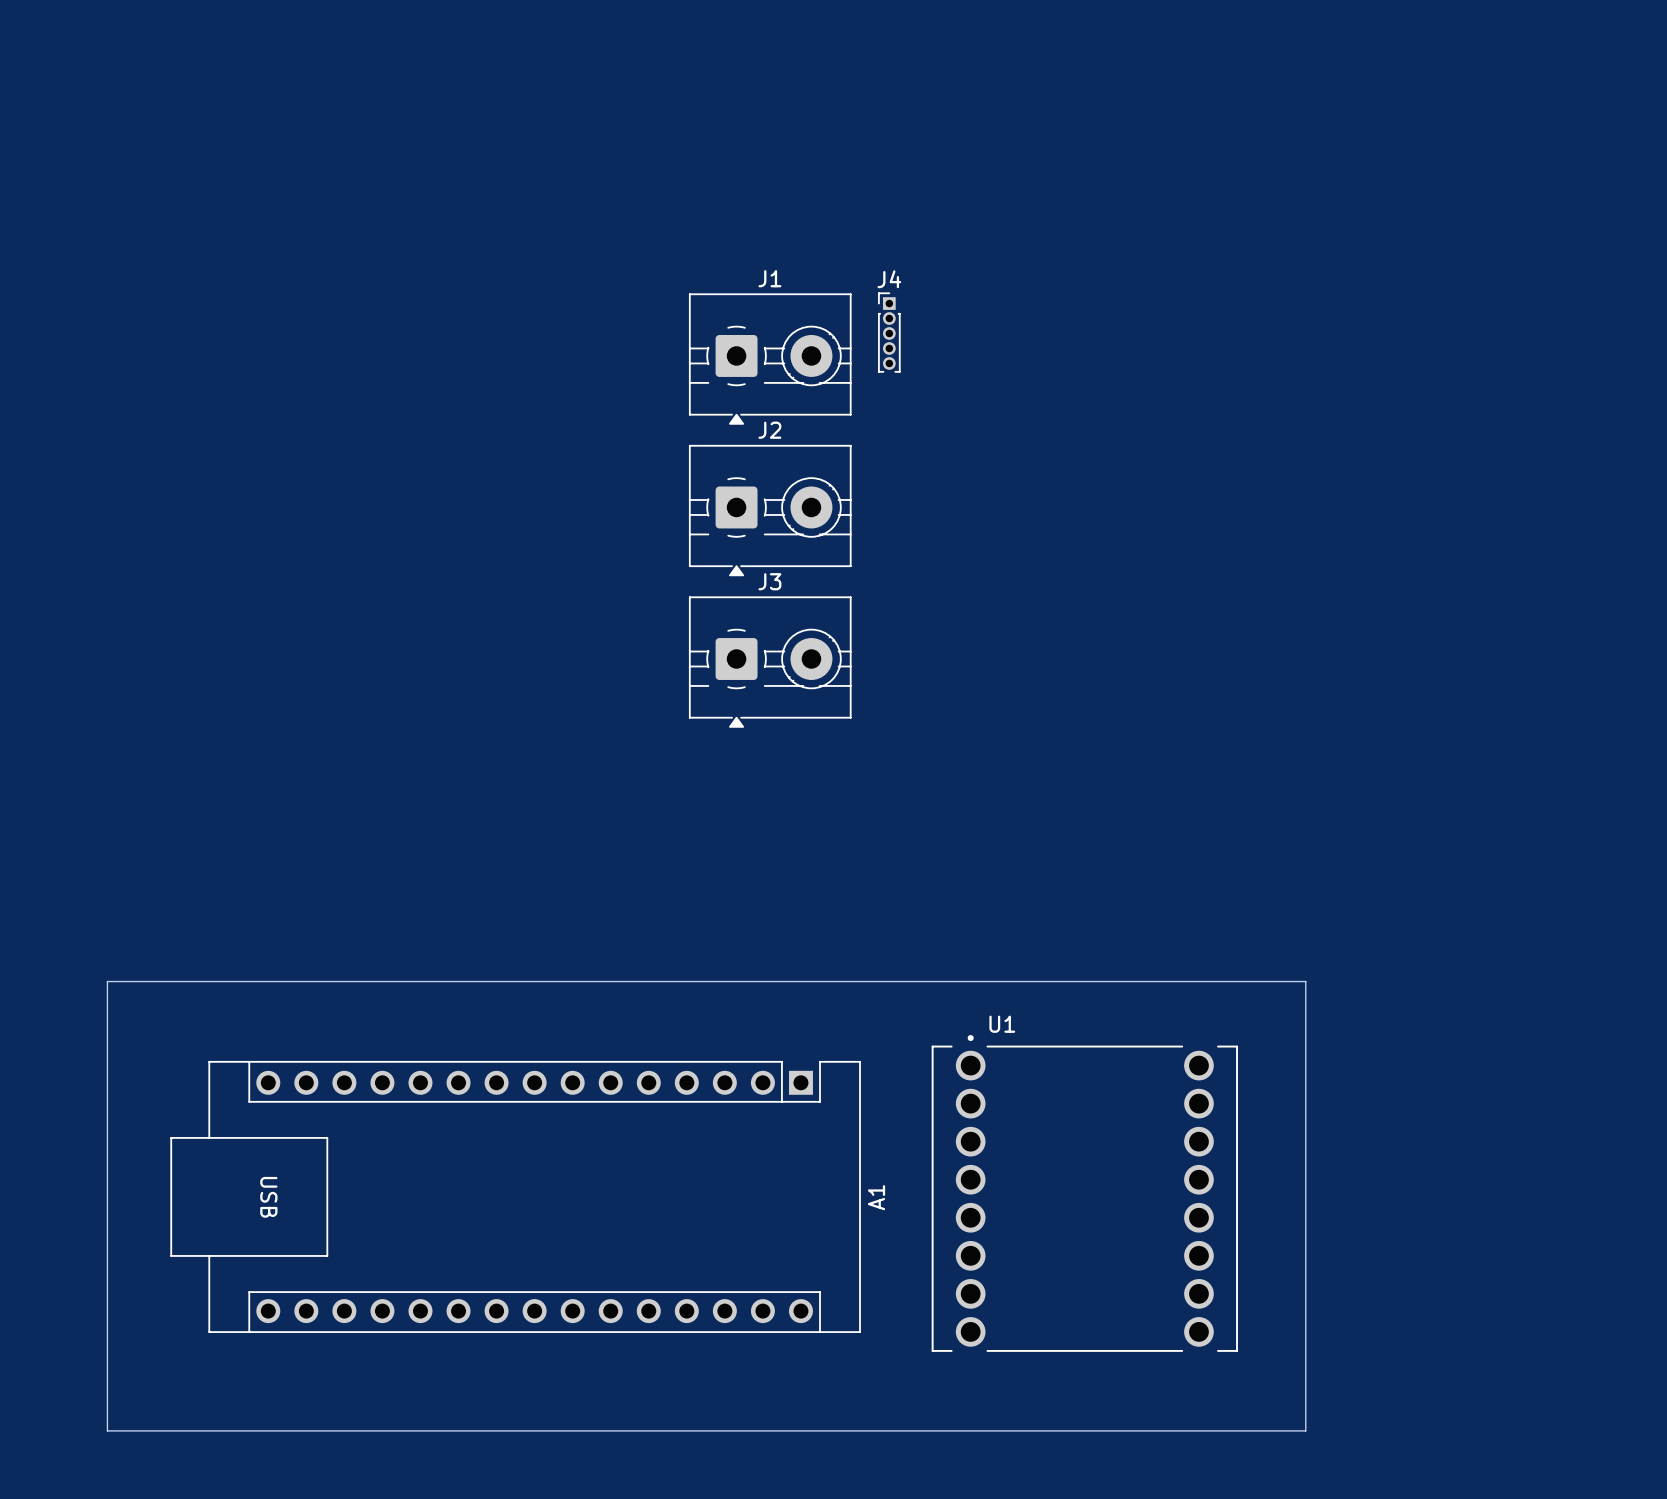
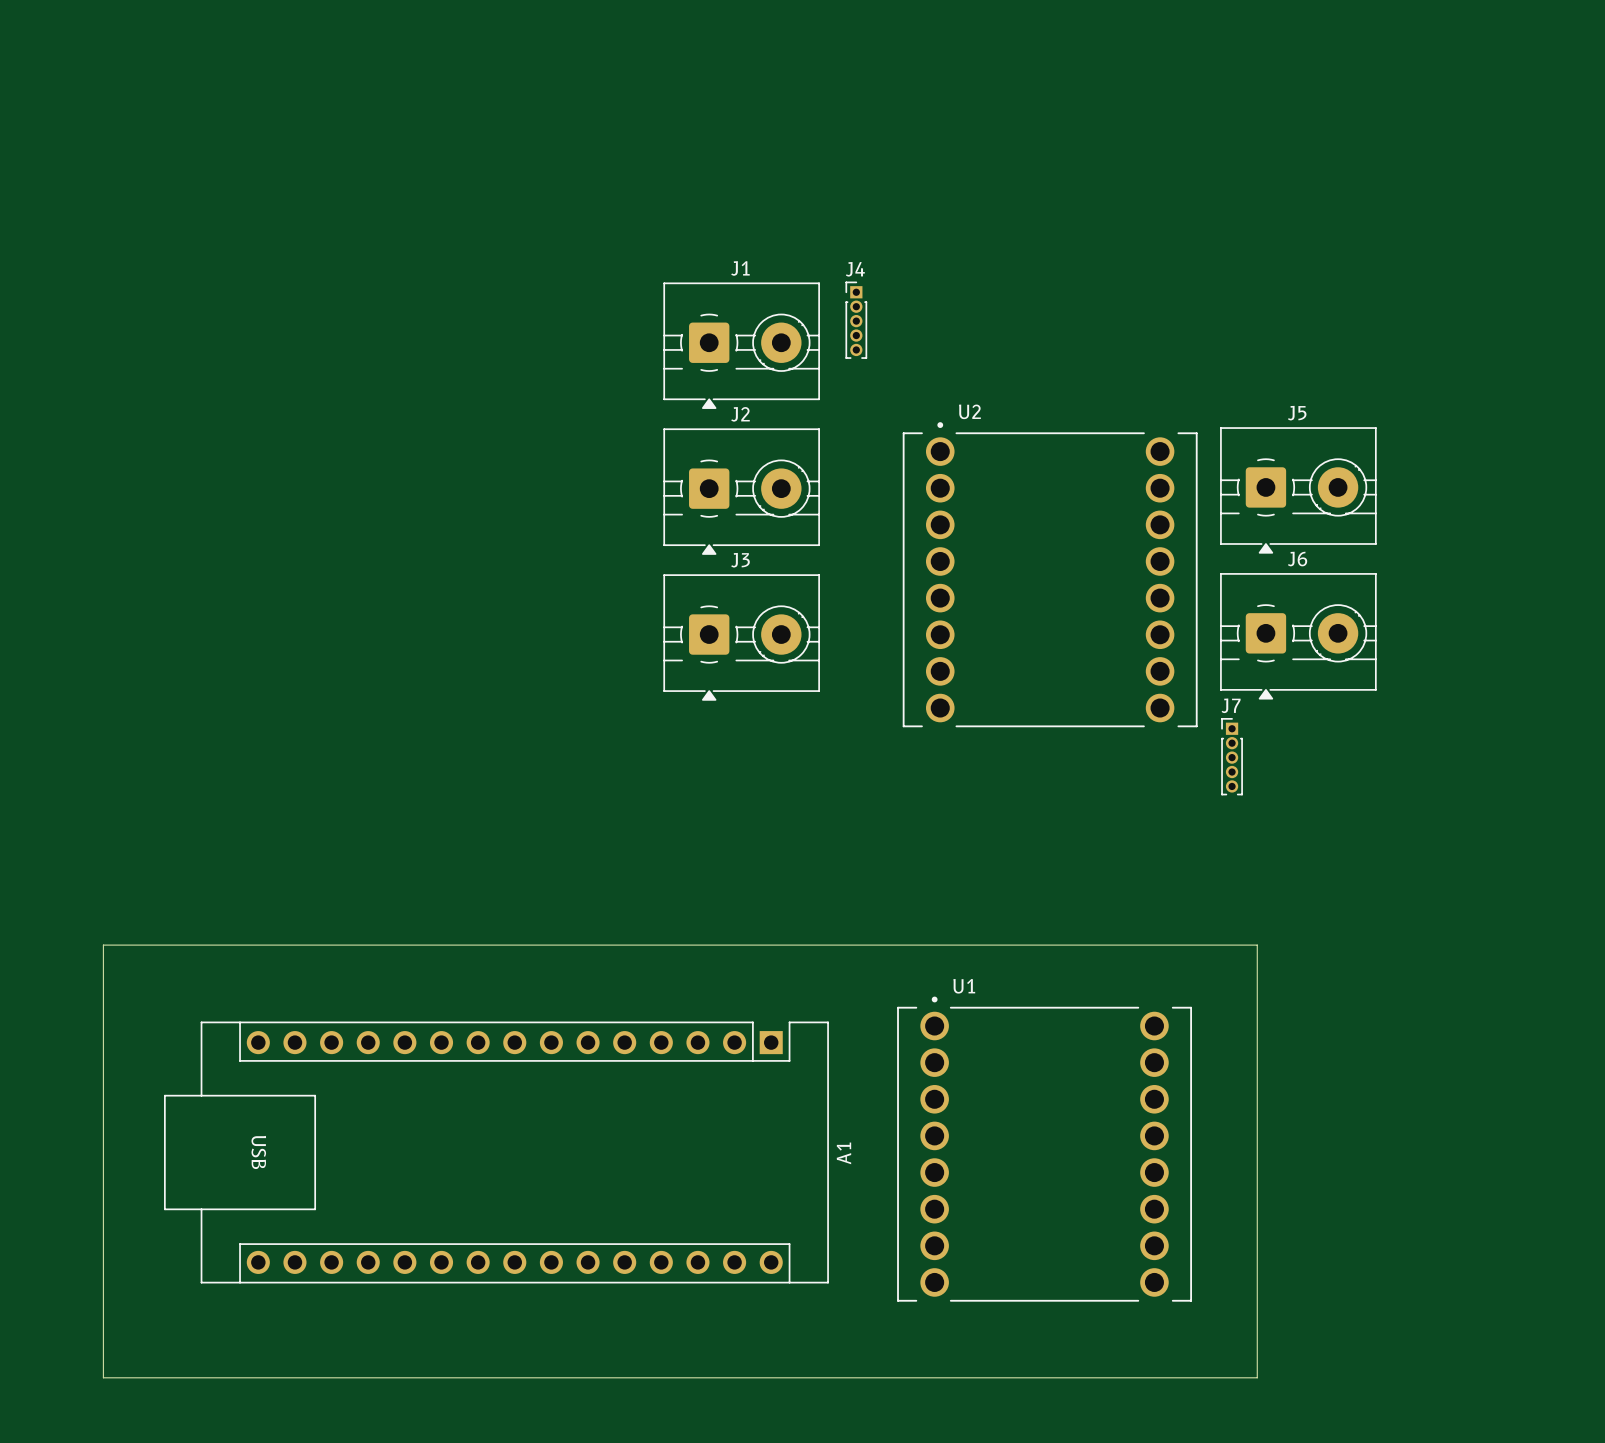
J5: none -> (1298, 490)
U2: none -> (1050, 574)
J6: none -> (1298, 636)
J7: none -> (1232, 756)

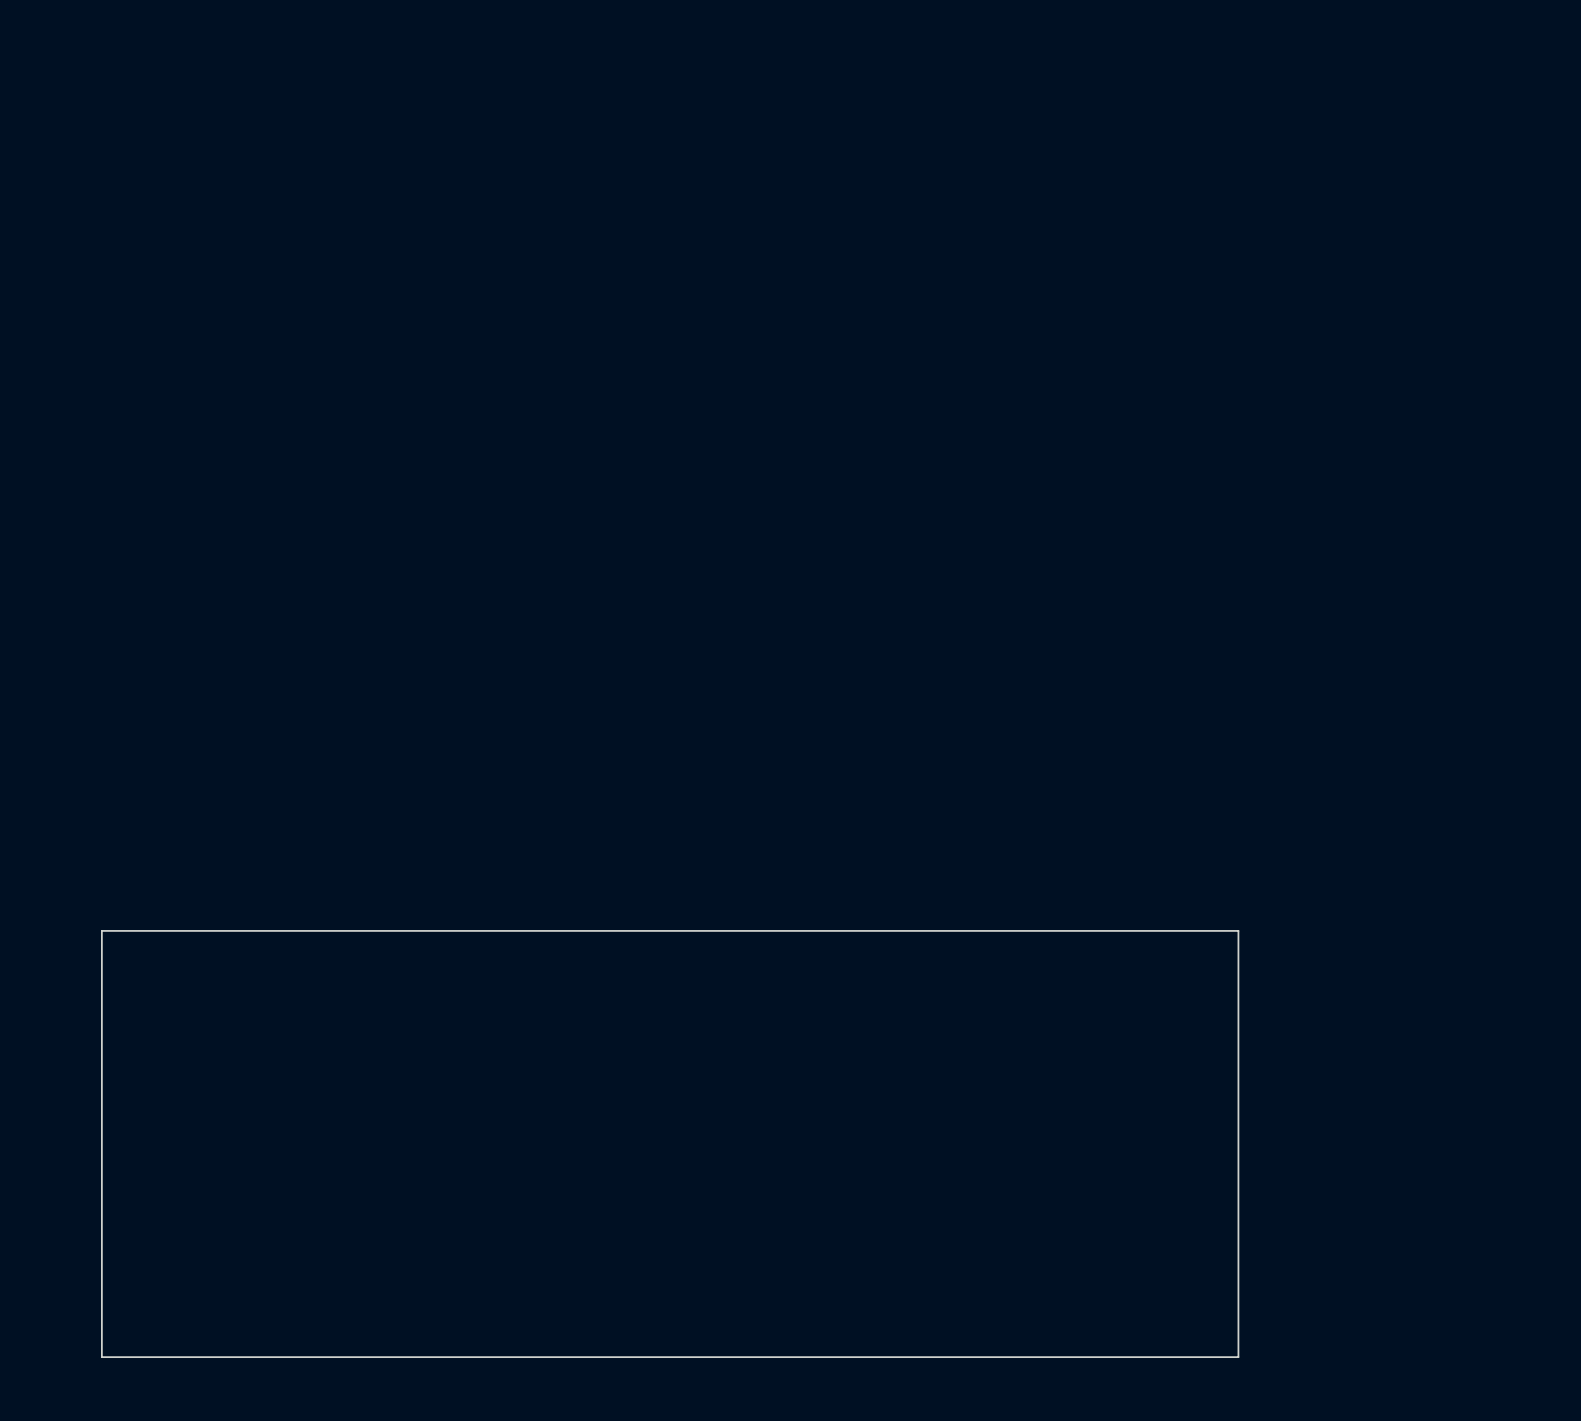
J4: (856, 320) -> none
J1: (741, 345) -> none
J5: (1298, 490) -> none
J2: (741, 491) -> none
U2: (1050, 574) -> none
J6: (1298, 636) -> none
J3: (741, 637) -> none
J7: (1232, 756) -> none
U1: (1044, 1149) -> none
A1: (496, 1152) -> none

